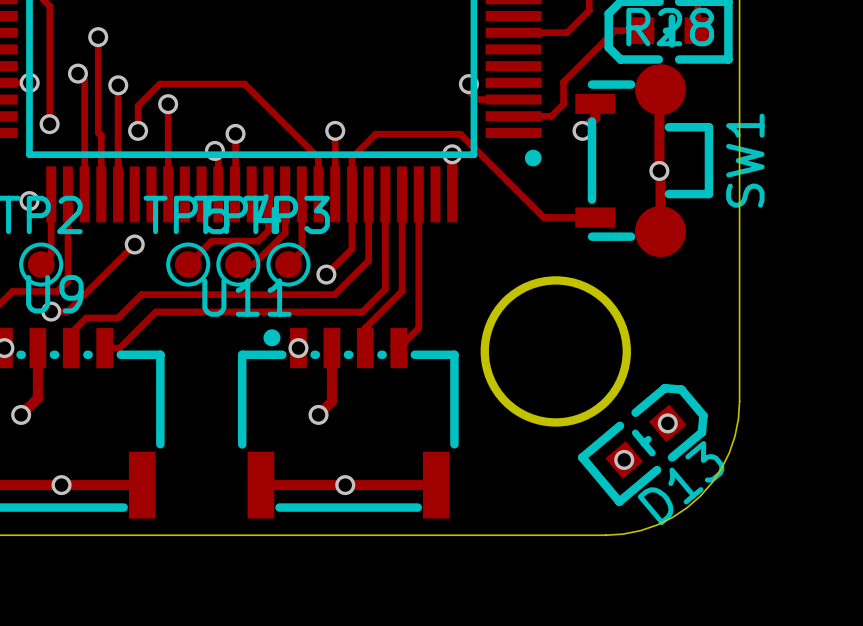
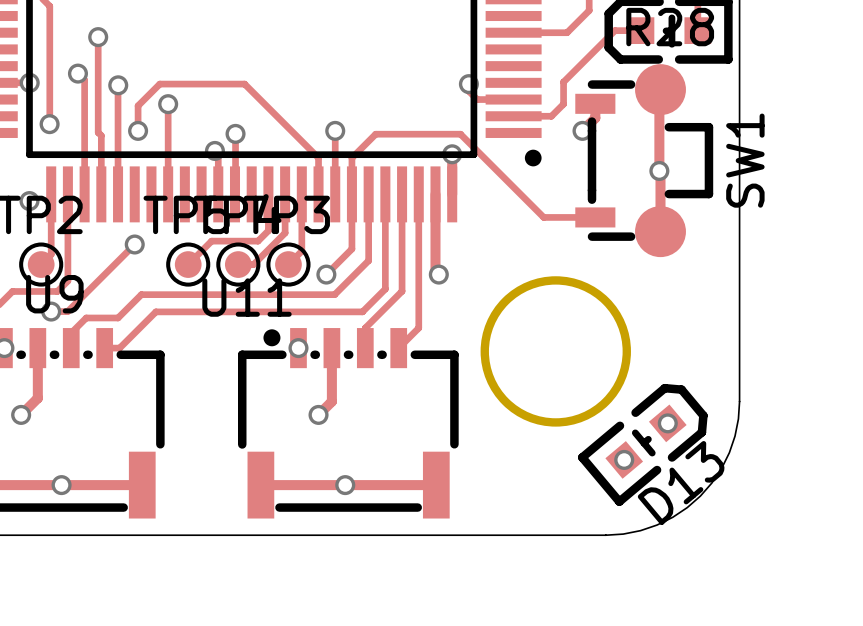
track: none -> (435, 194) (435, 271) (438, 274)
via: none -> (438, 274)

